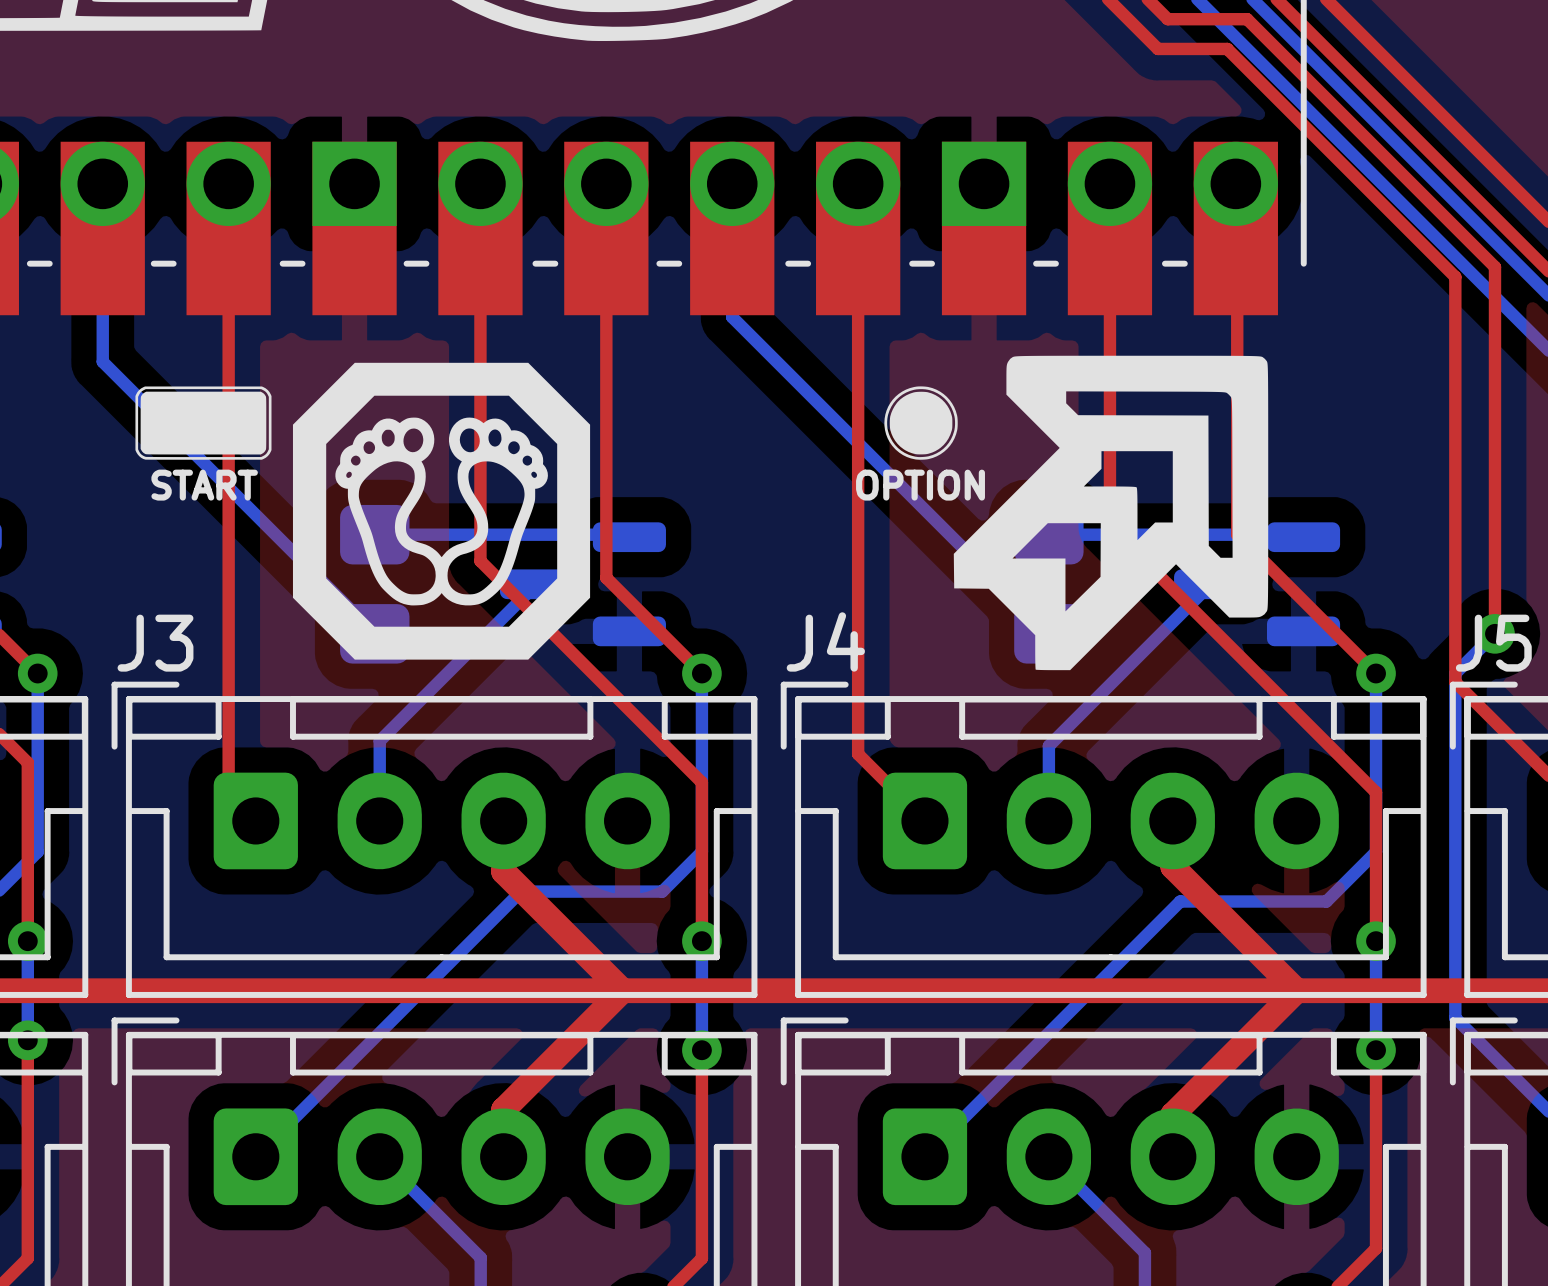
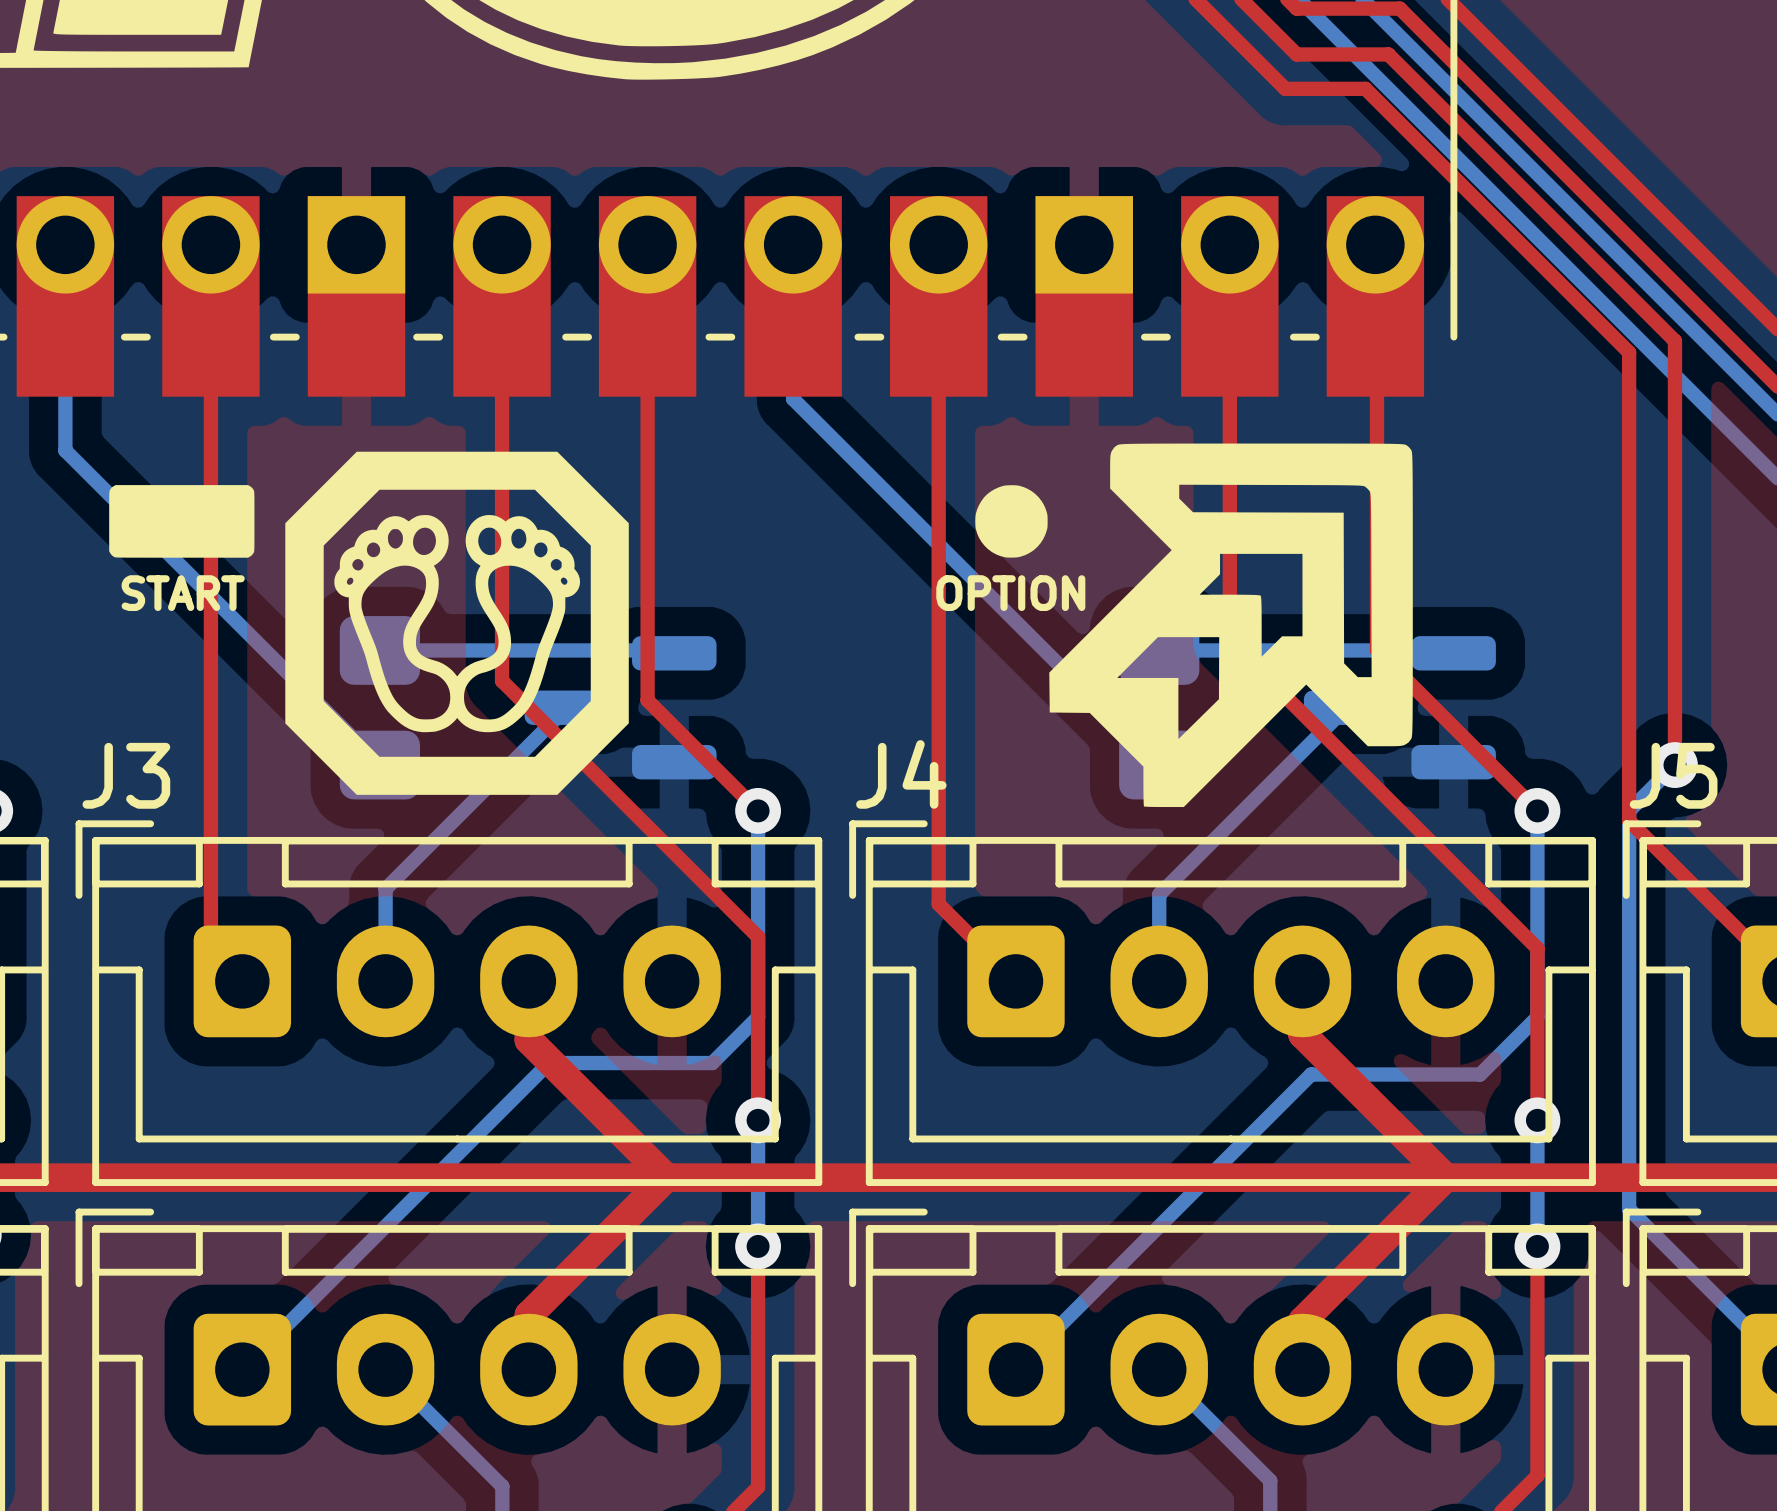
drawing shape: [135, 386, 272, 460] -> [109, 485, 255, 558]
drawing shape: [884, 386, 958, 460] -> [975, 485, 1048, 558]

